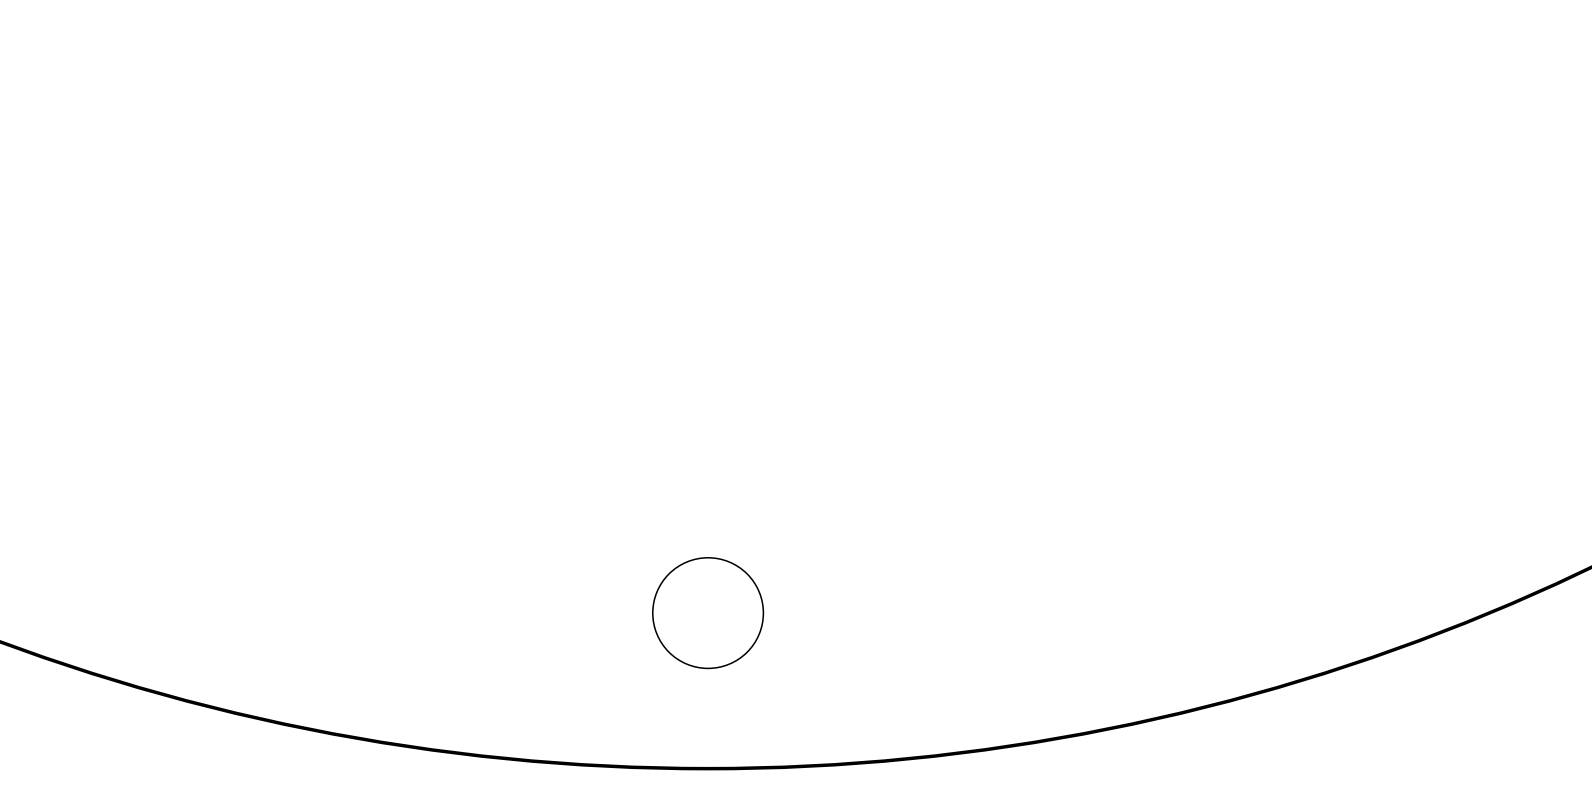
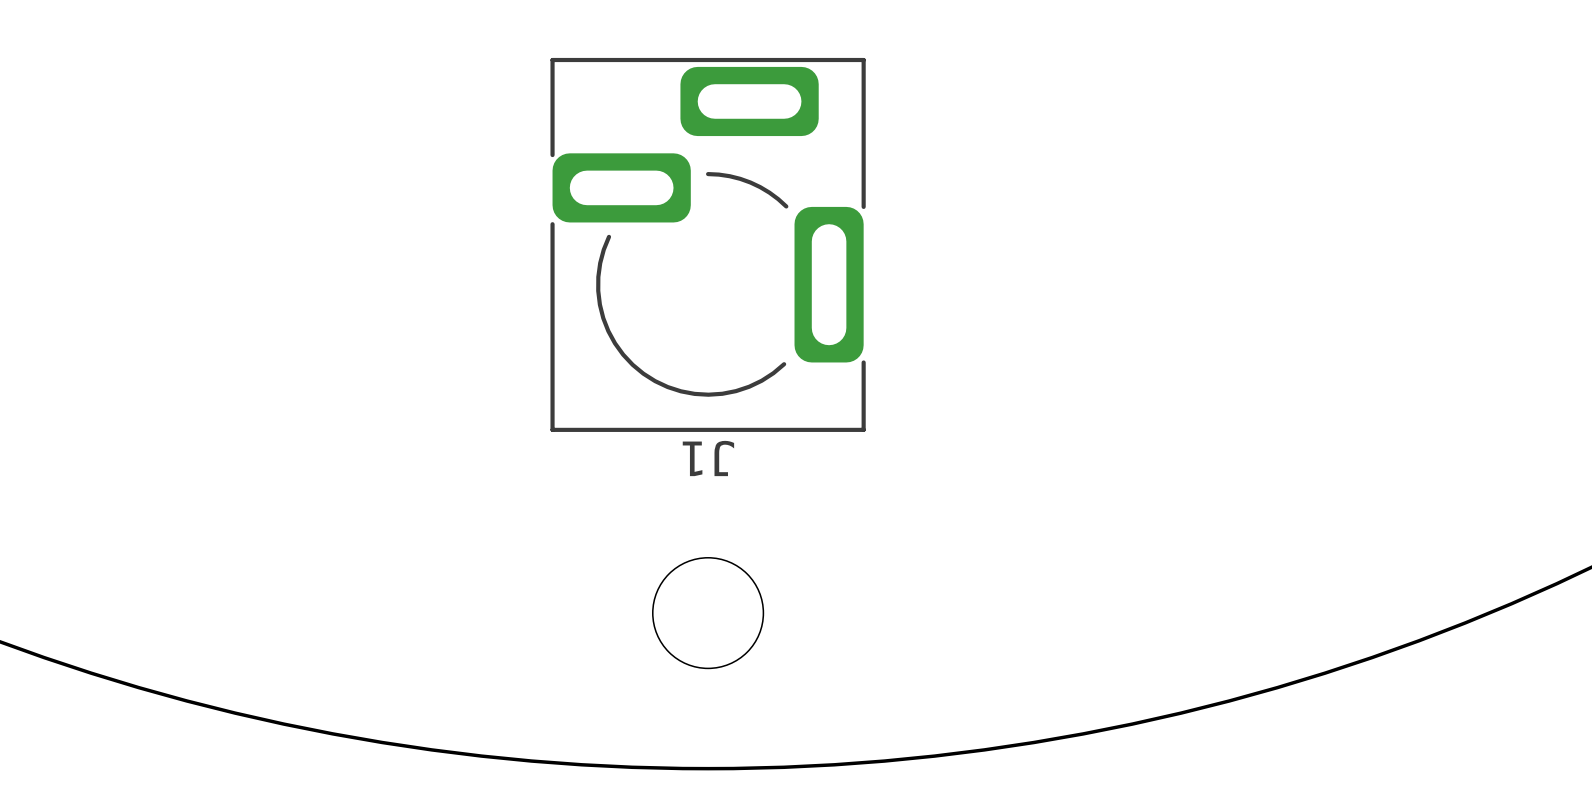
J1: none -> (708, 244)

